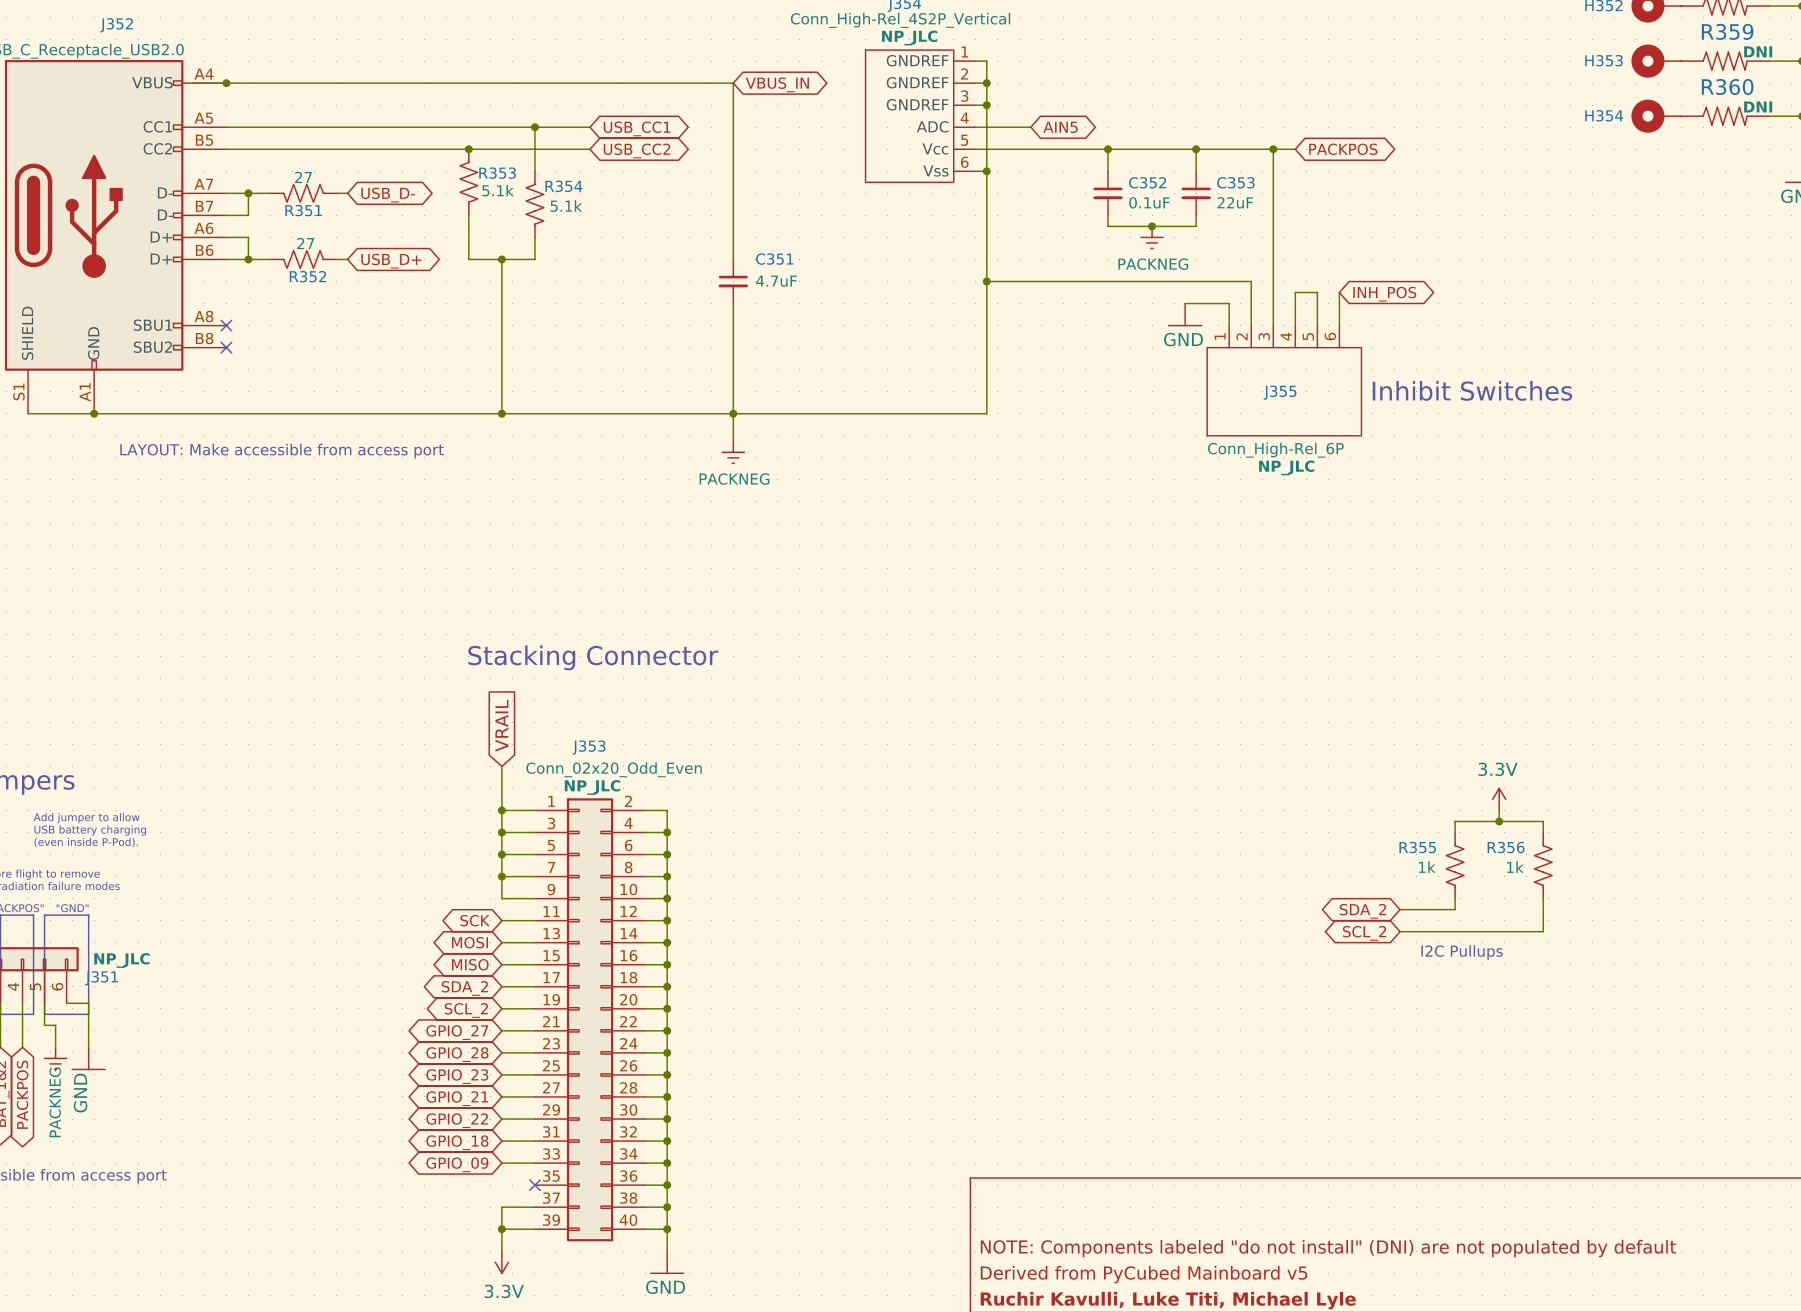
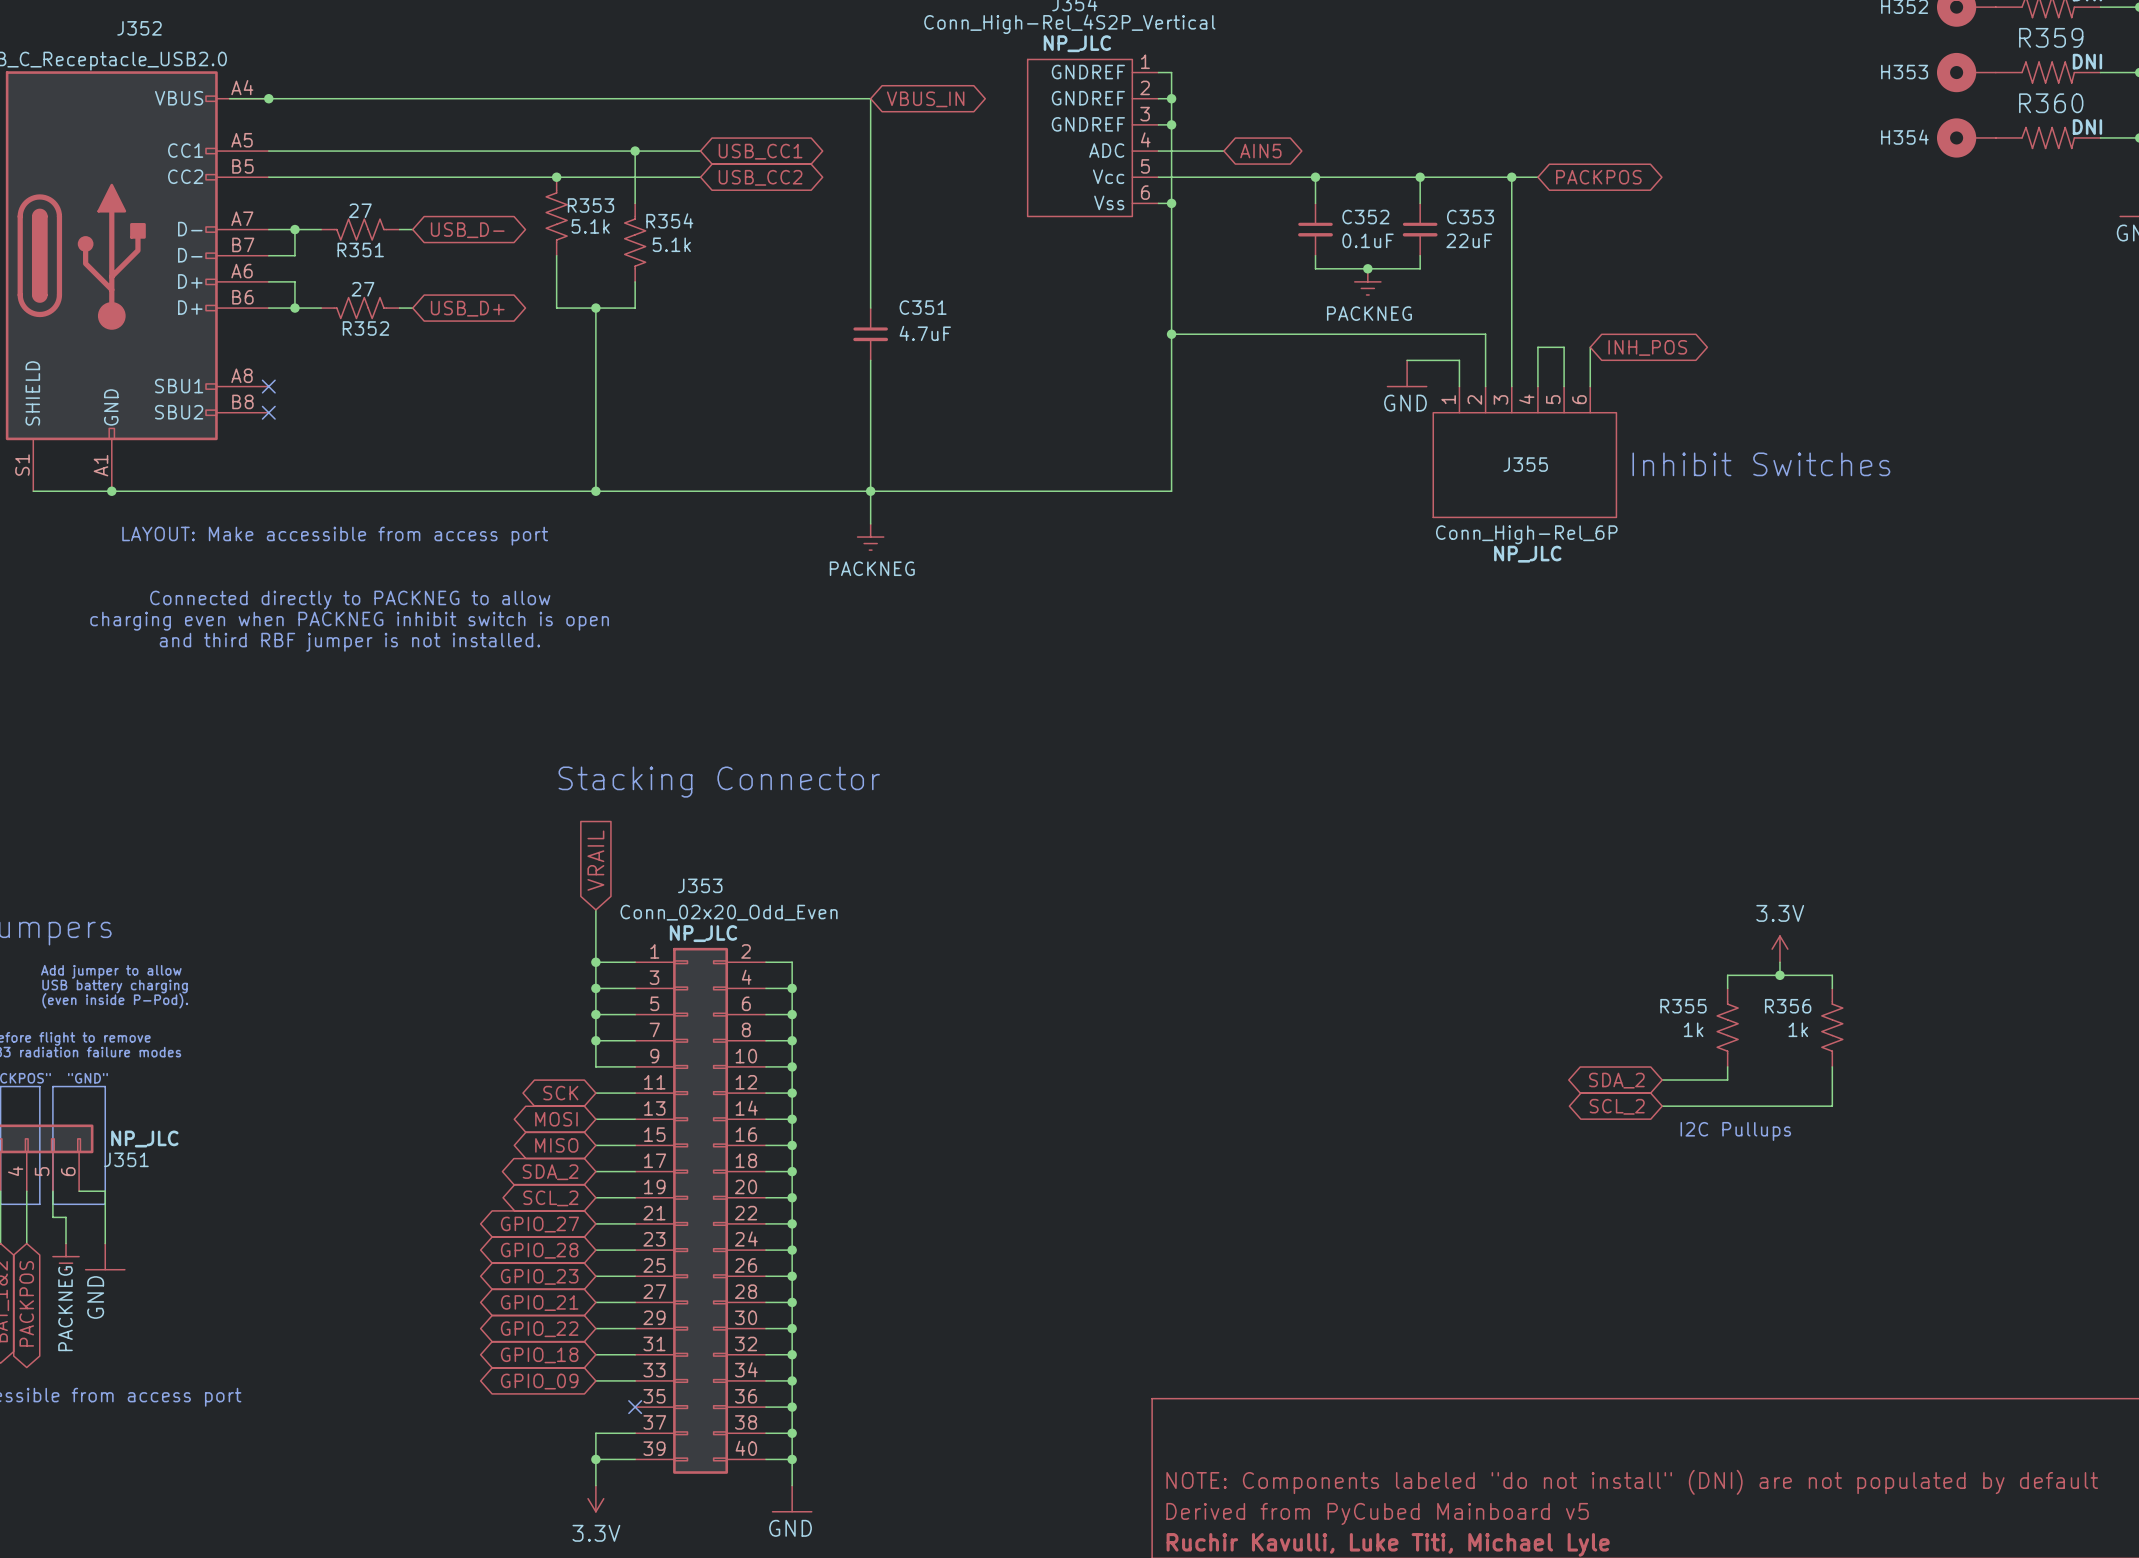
text: none -> Connected directly to PACKNEG to allow (350, 600)
text: none -> charging even when PACKNEG inhibit switch is open (349, 621)
text: none -> and third RBF jumper is not installed. (349, 642)

